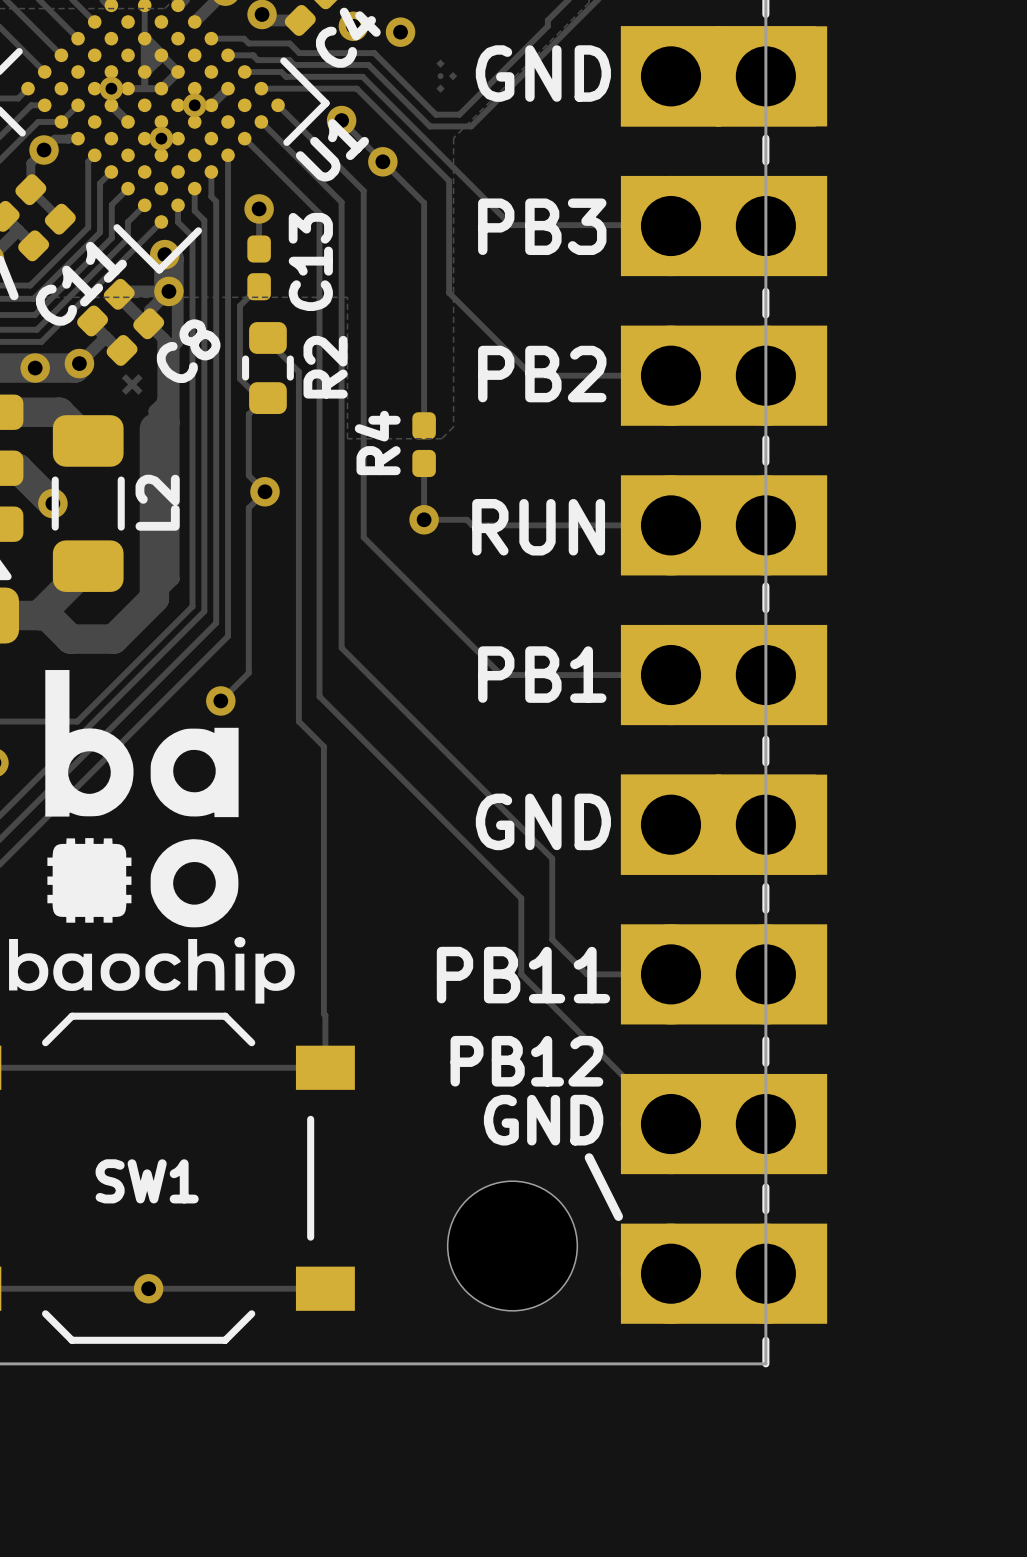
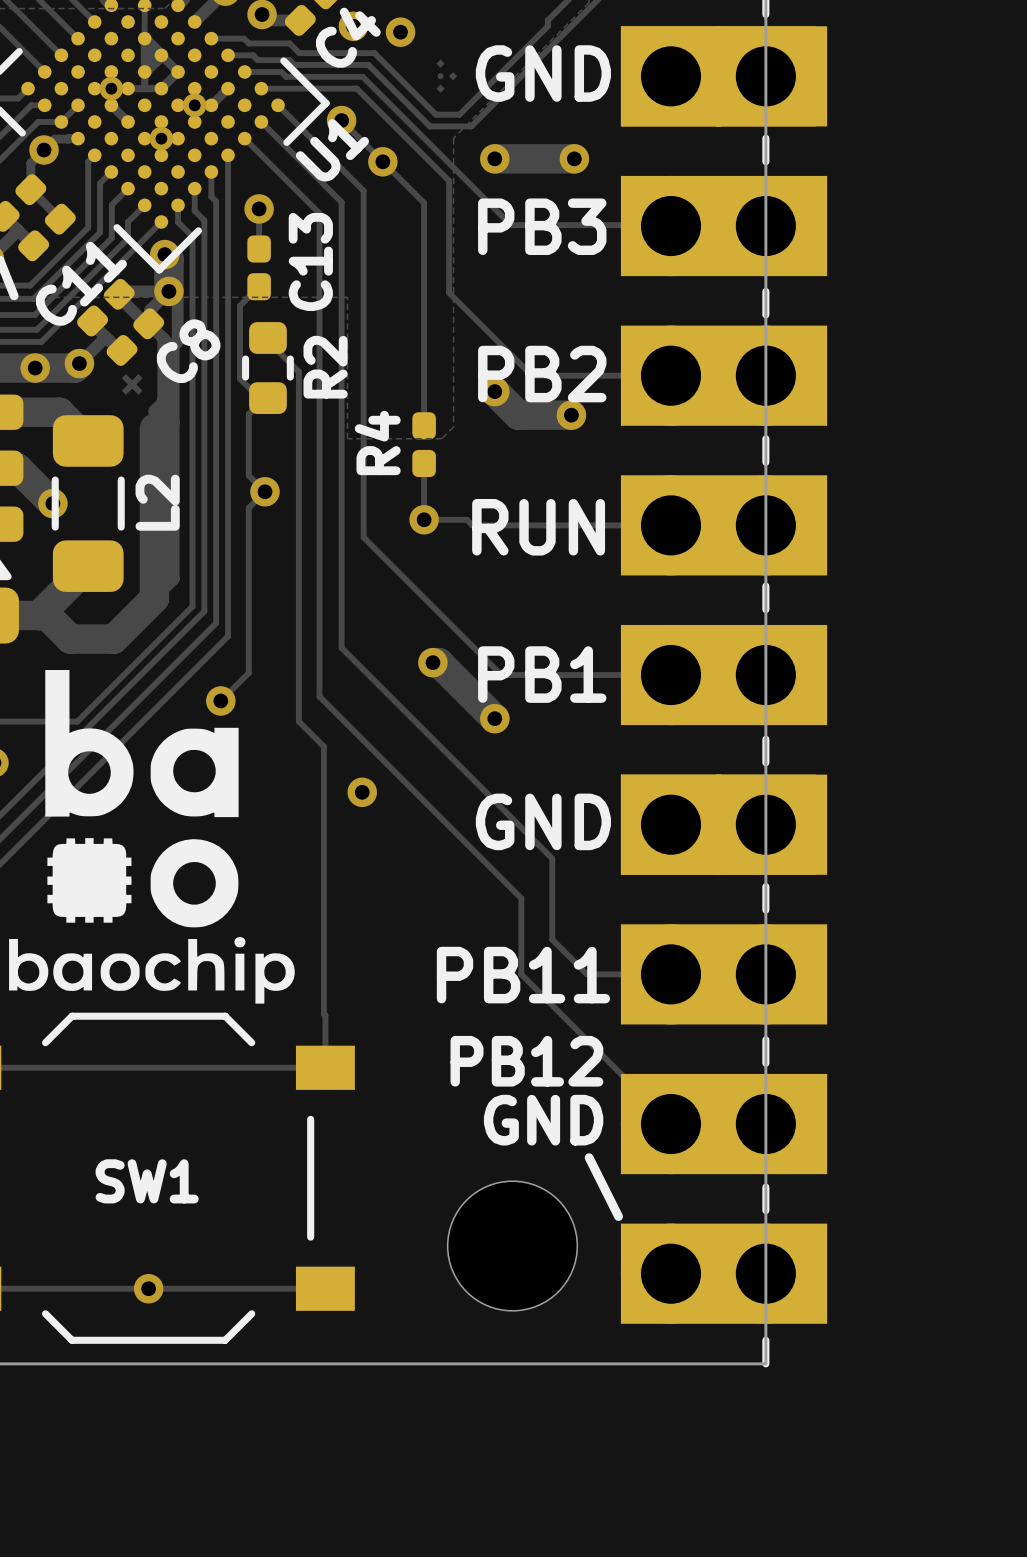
track: none -> (494, 158) (574, 158)
via: none -> (494, 158)
via: none -> (574, 158)
track: none -> (494, 391) (518, 415) (571, 415)
via: none -> (494, 391)
via: none -> (571, 415)
track: none -> (432, 662) (438, 662) (494, 718)
via: none -> (432, 662)
via: none -> (494, 718)
via: none -> (362, 792)

